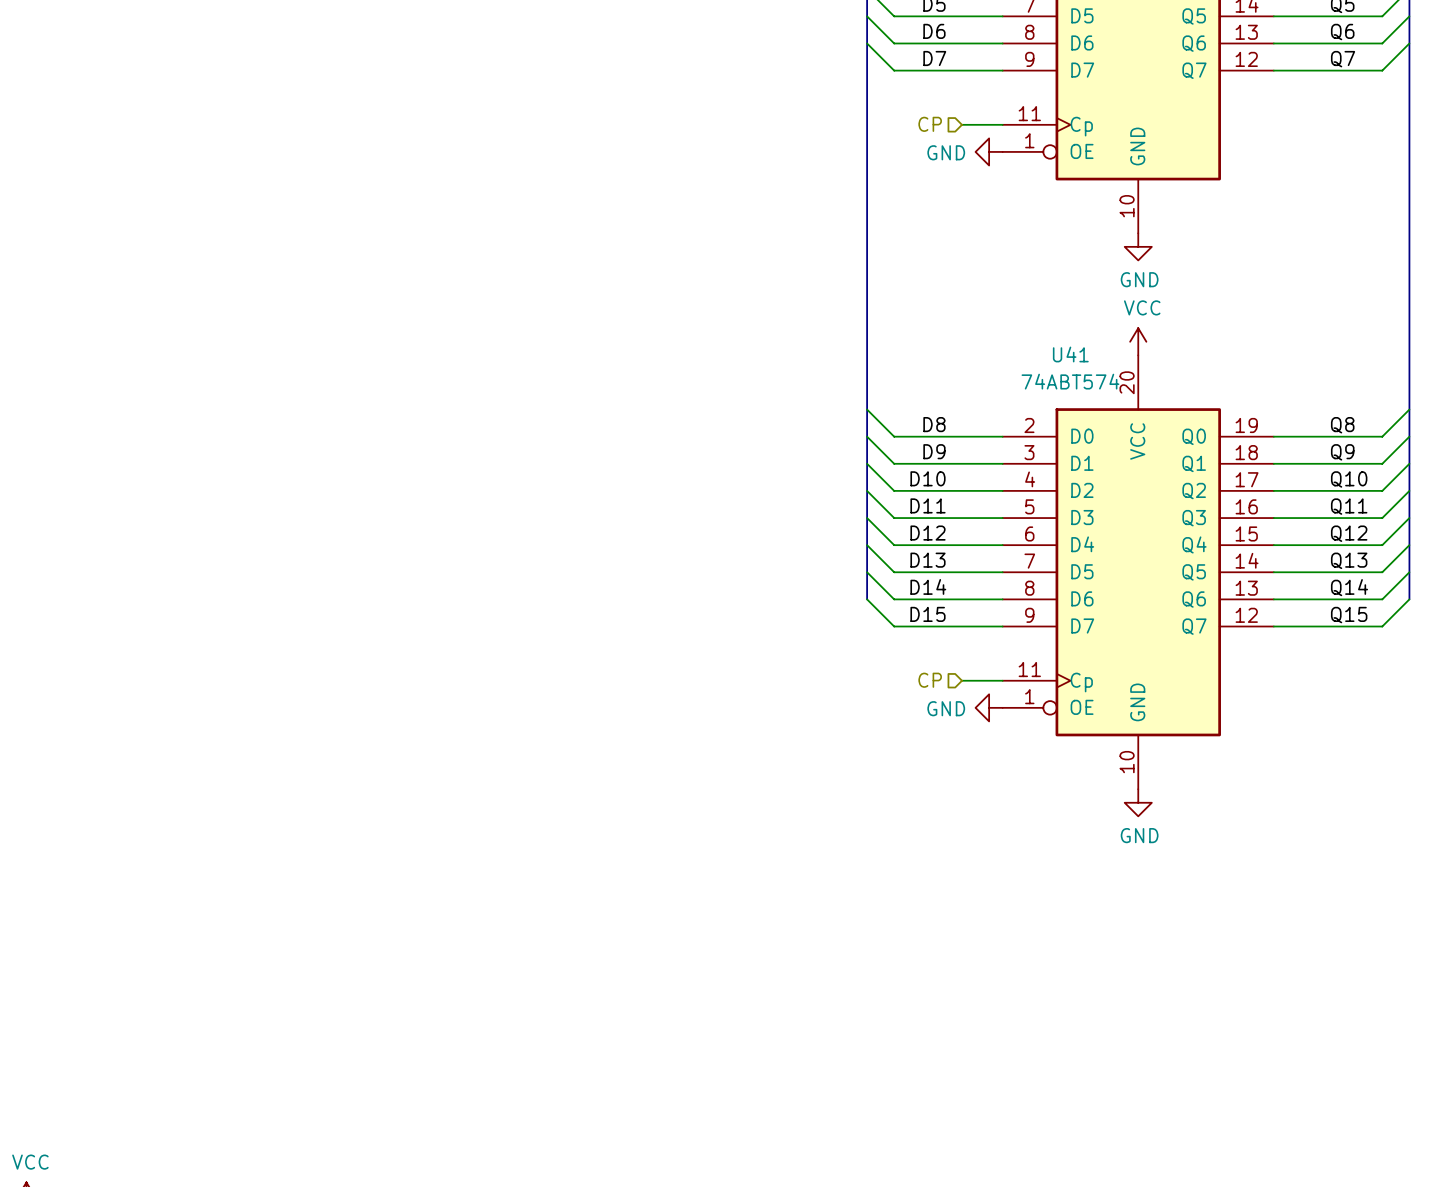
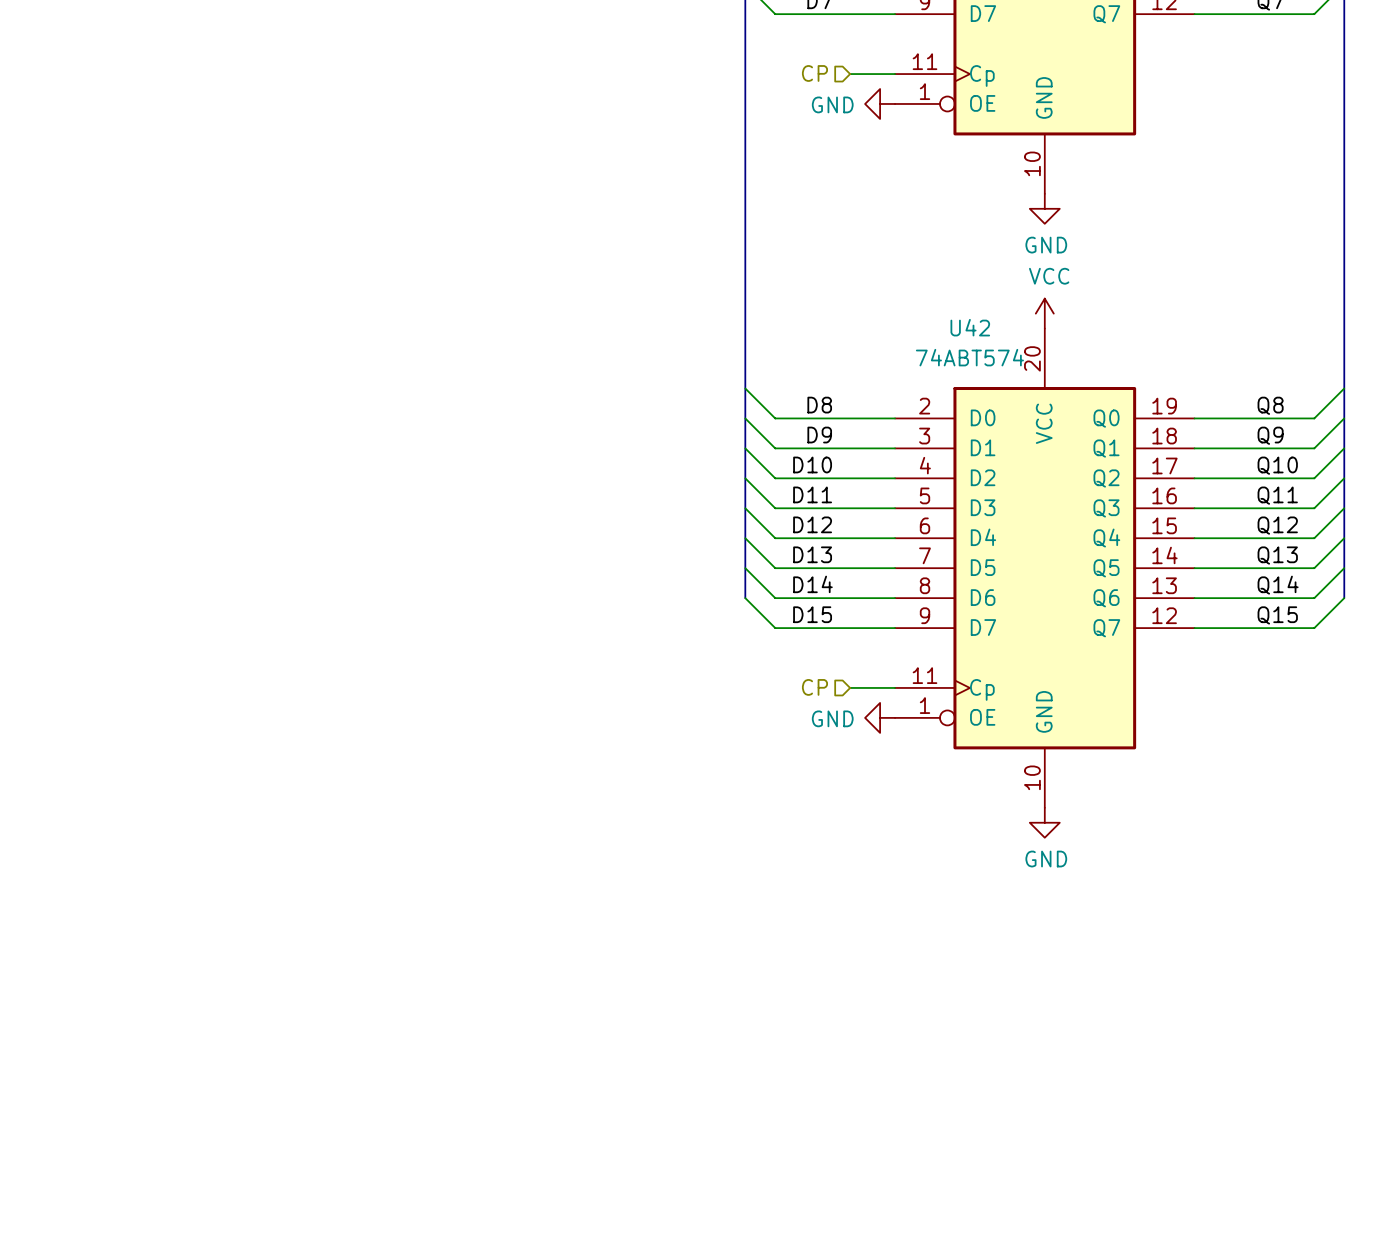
U41 name: U41 (1070, 354) -> U42 (970, 327)

